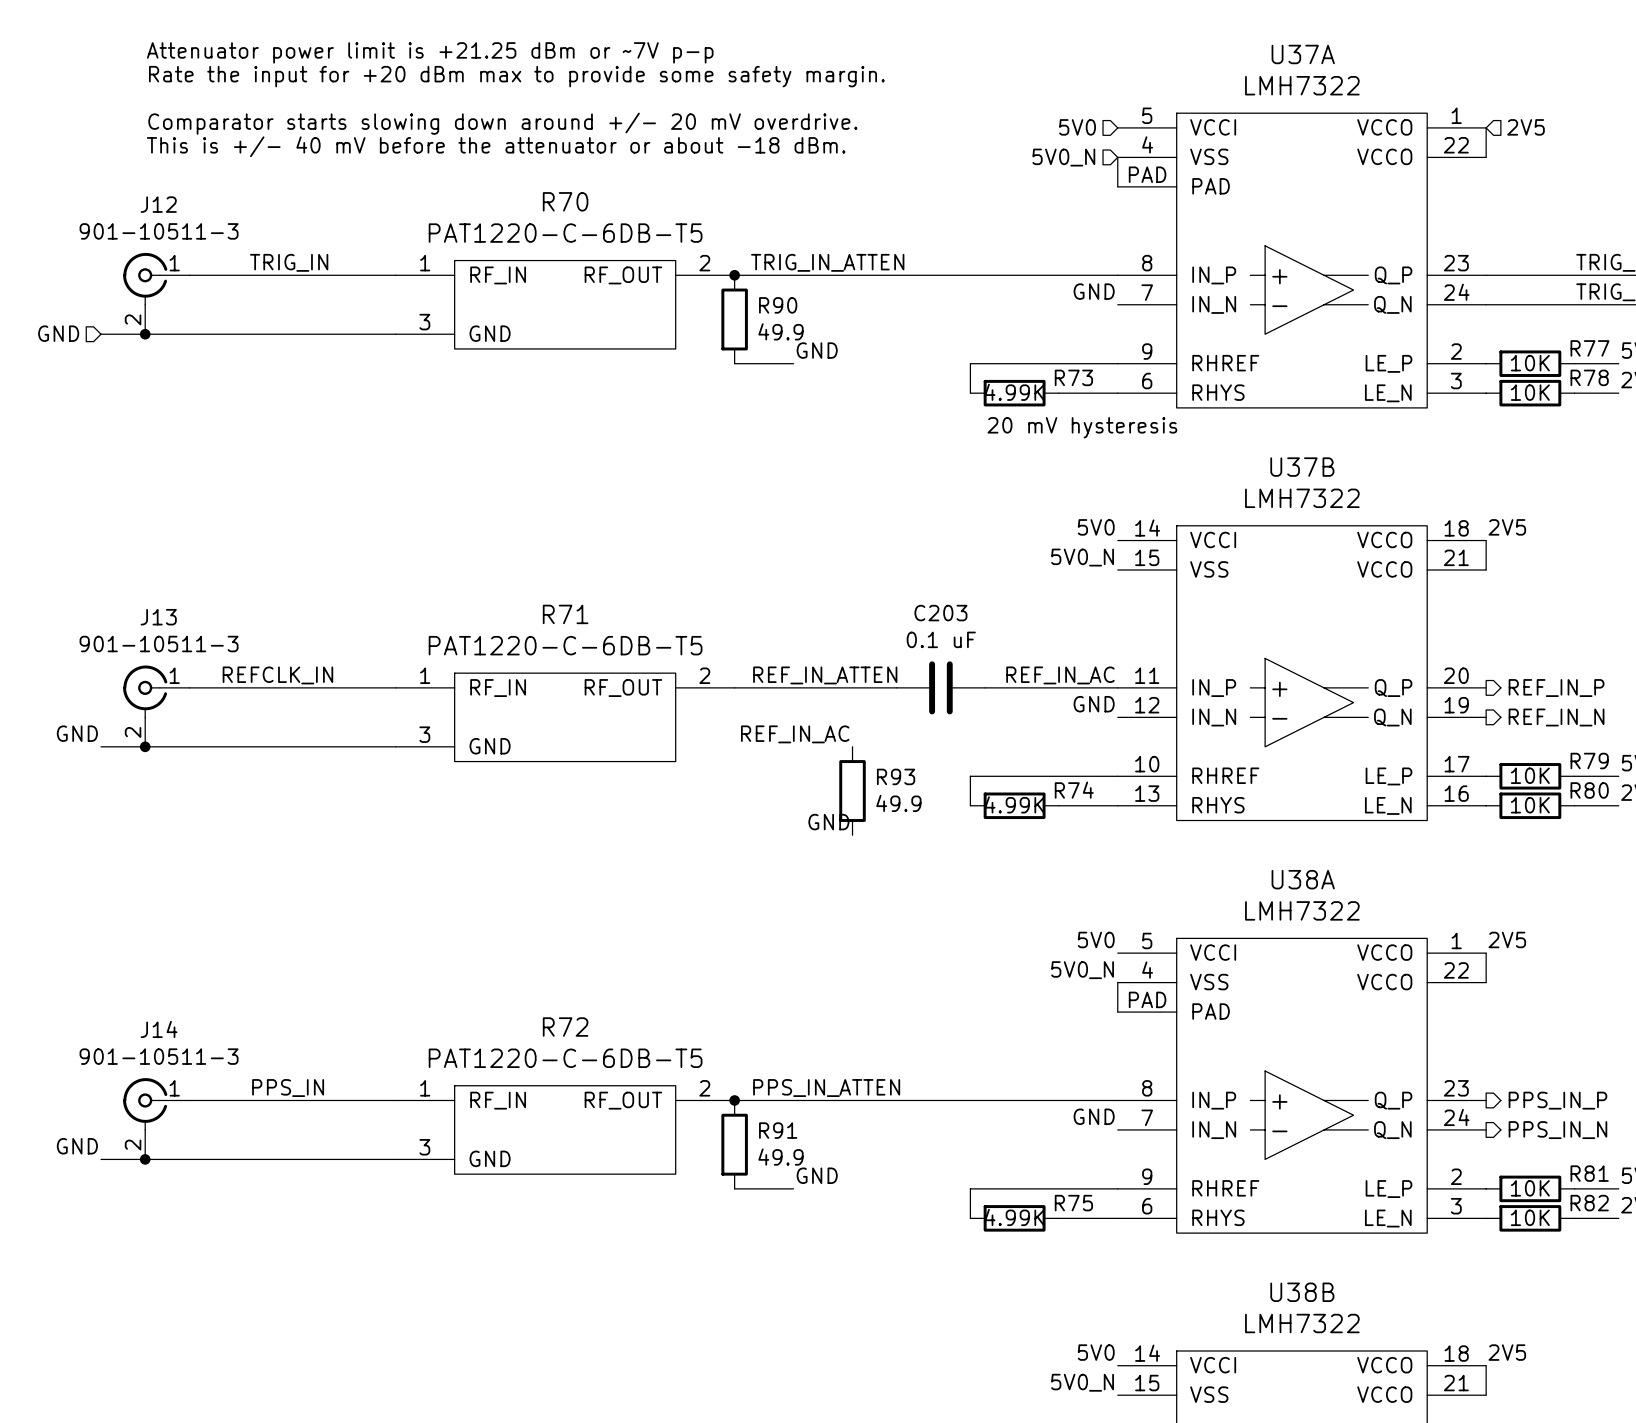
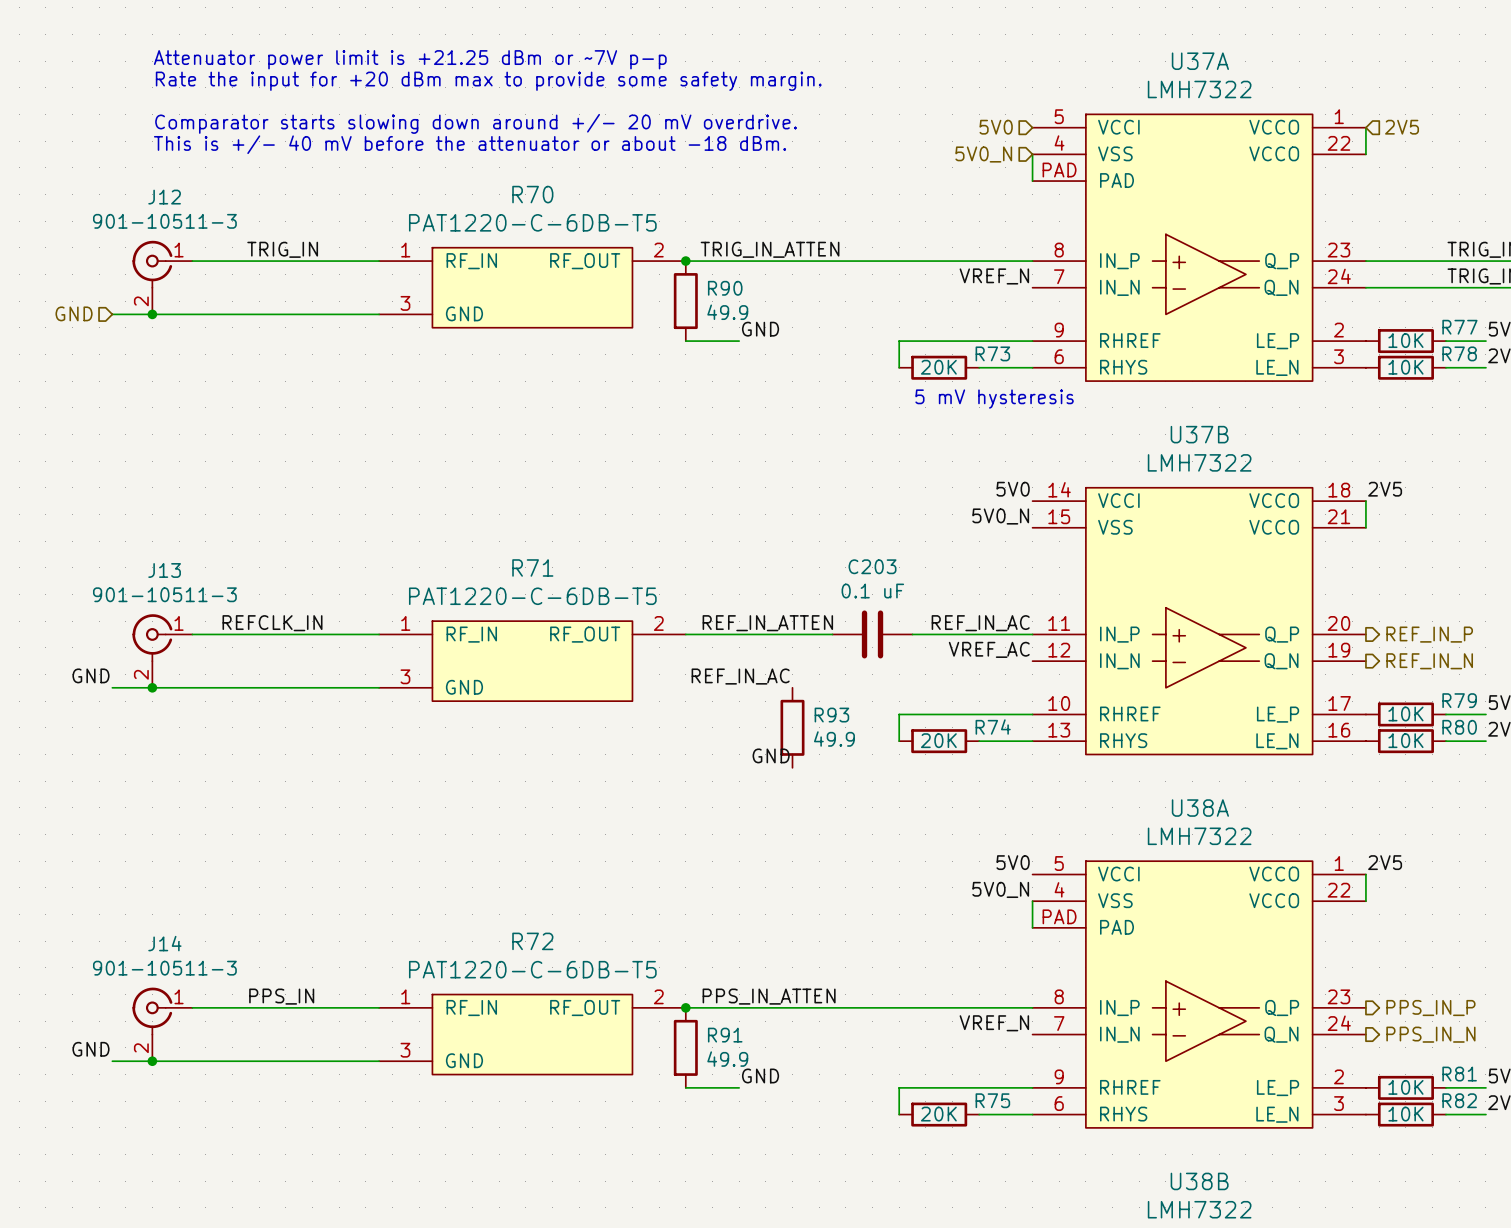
label: GND (1094, 291) -> VREF_N (994, 276)
R73 value: 4.99K (1014, 392) -> 20K (938, 367)
text: 20 mV hysteresis (1082, 427) -> 5 mV hysteresis (994, 399)
label: GND (1094, 704) -> VREF_AC (989, 649)
R74 value: 4.99K (1014, 804) -> 20K (938, 740)
label: GND (1094, 1116) -> VREF_N (994, 1023)
R75 value: 4.99K (1014, 1217) -> 20K (938, 1114)

